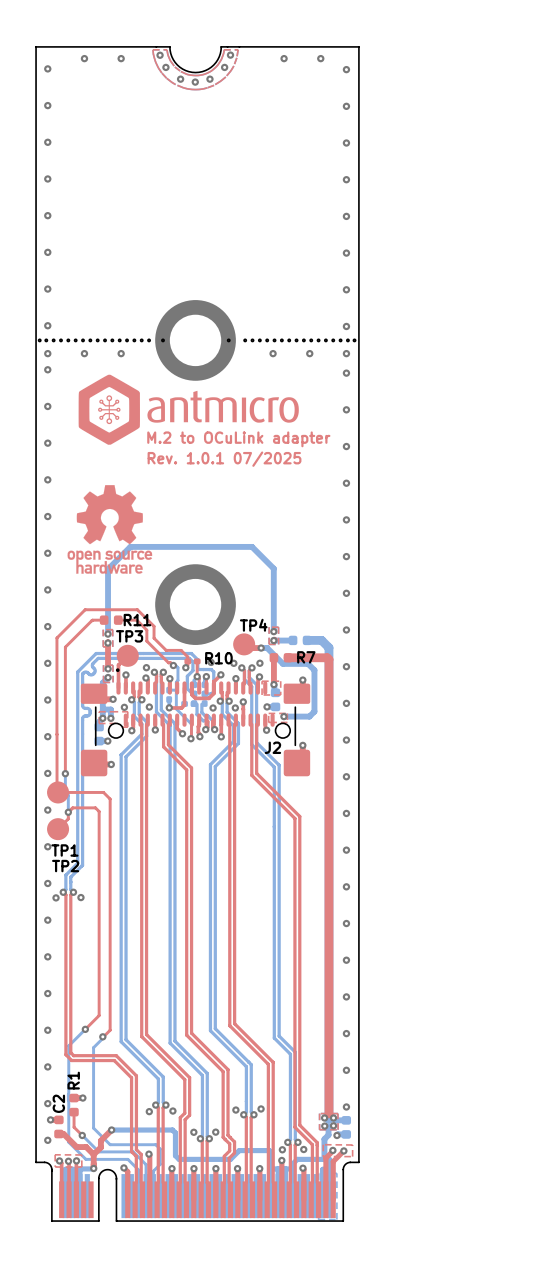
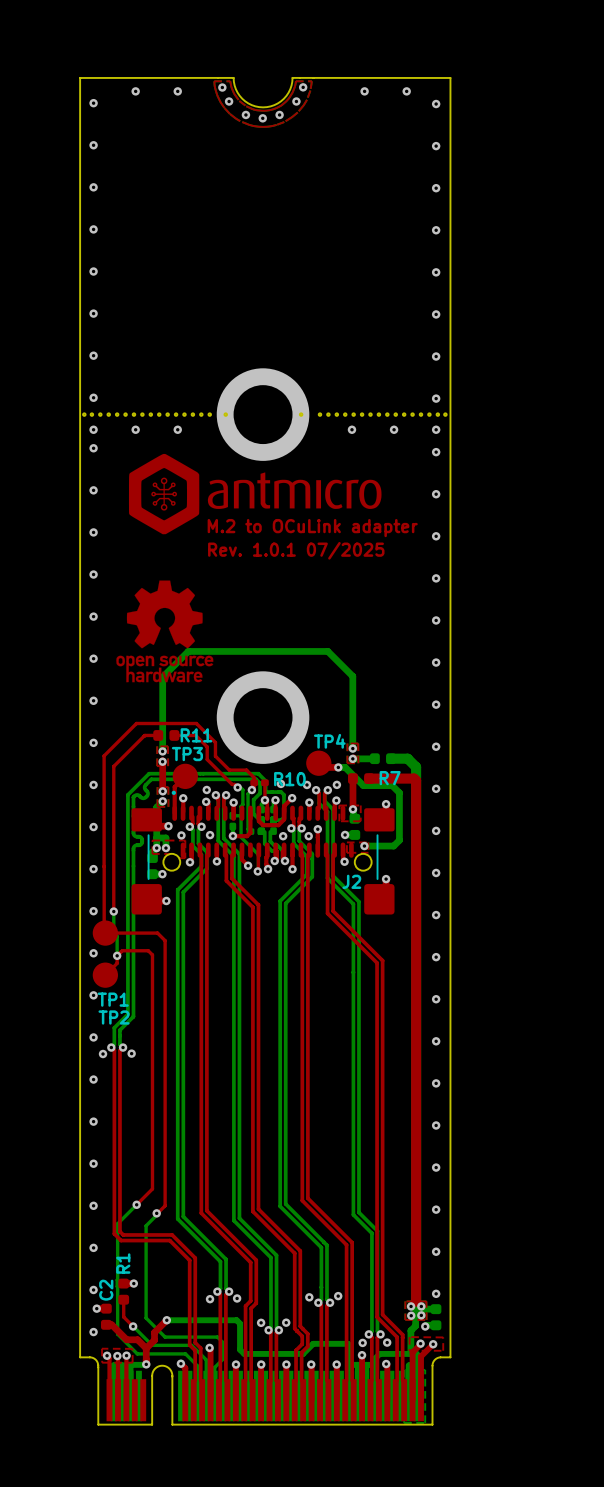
bottom track: none -> (251, 789) (248, 793) (248, 829) (250, 831)

